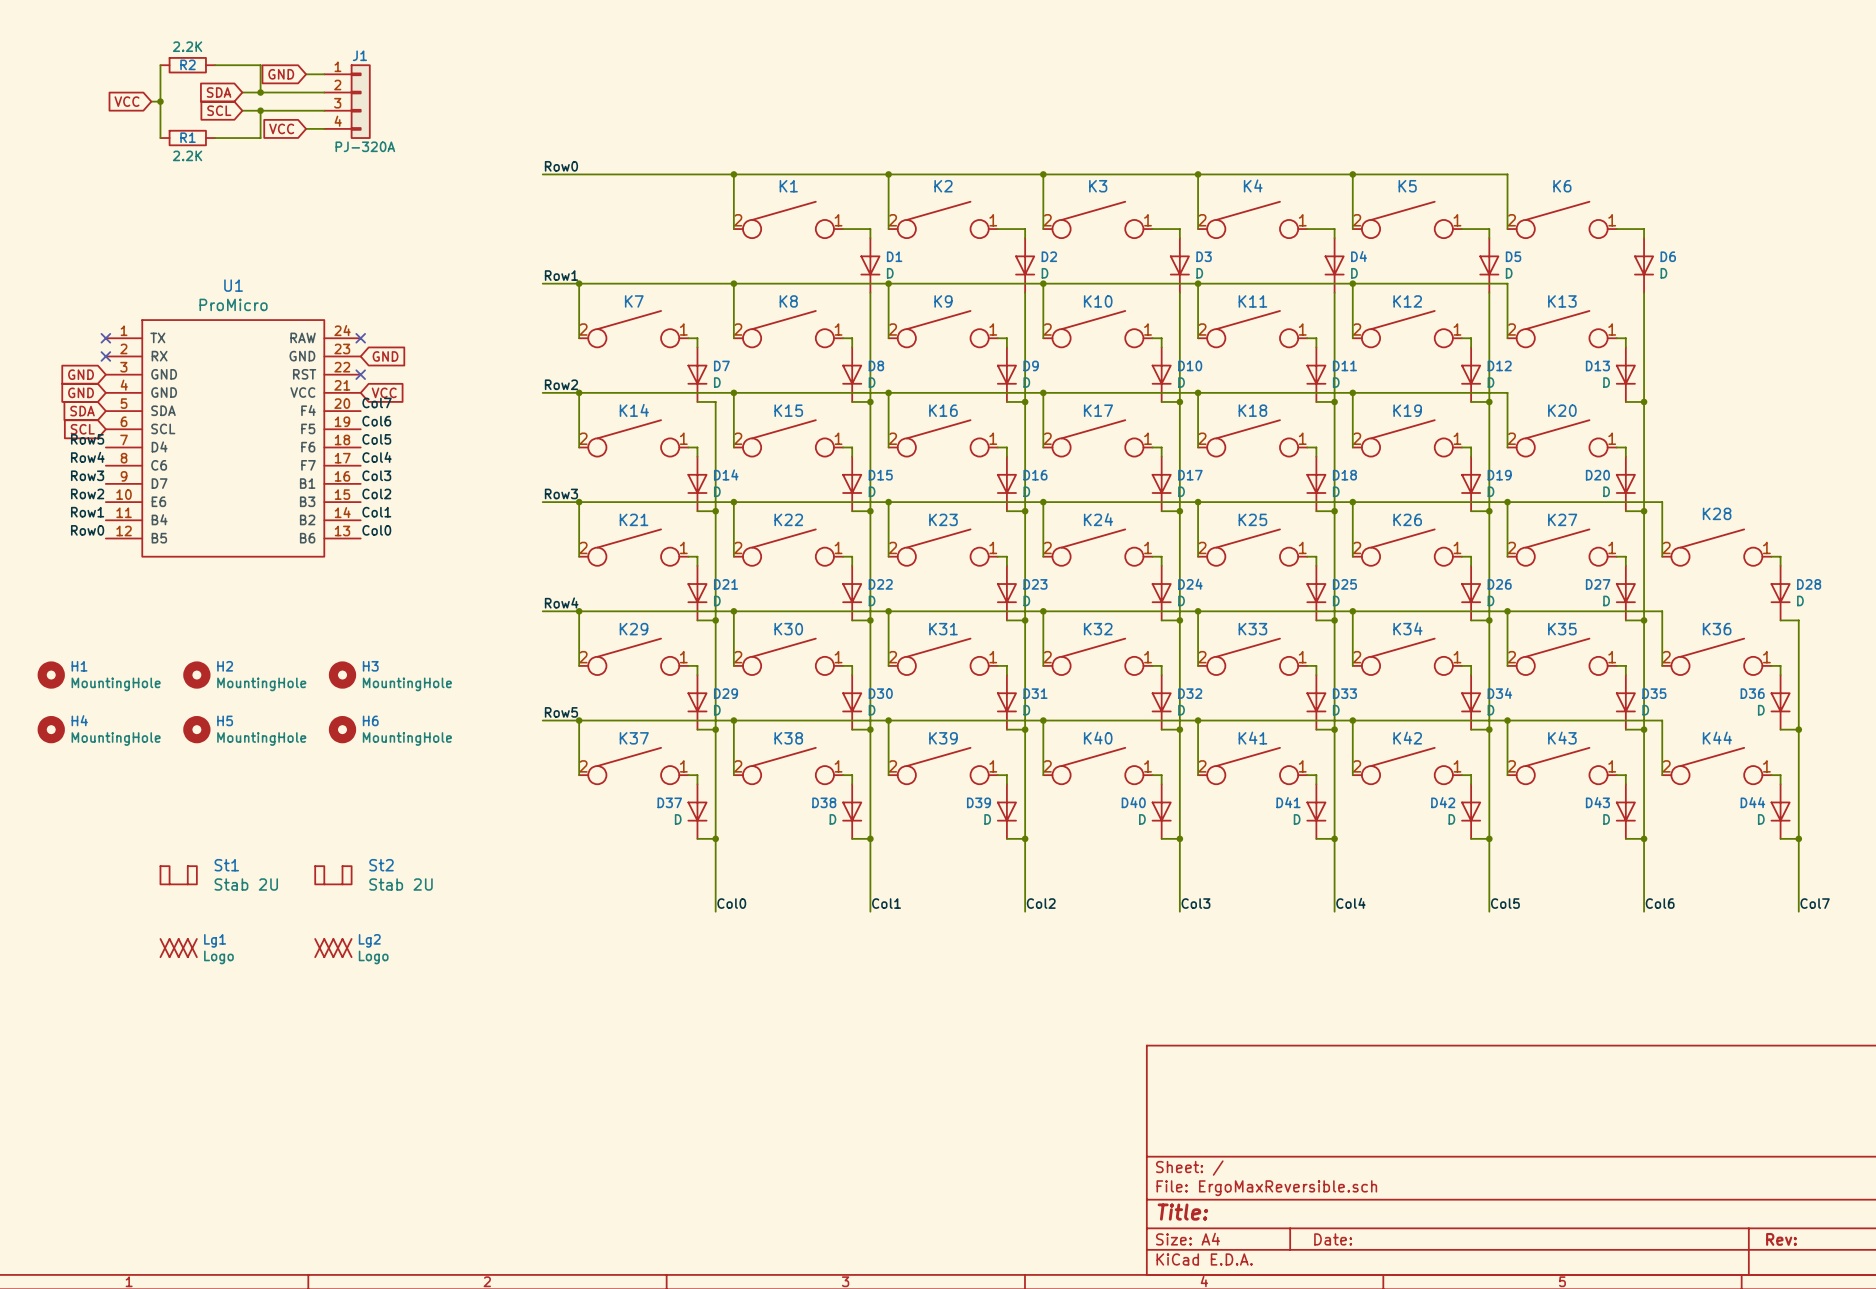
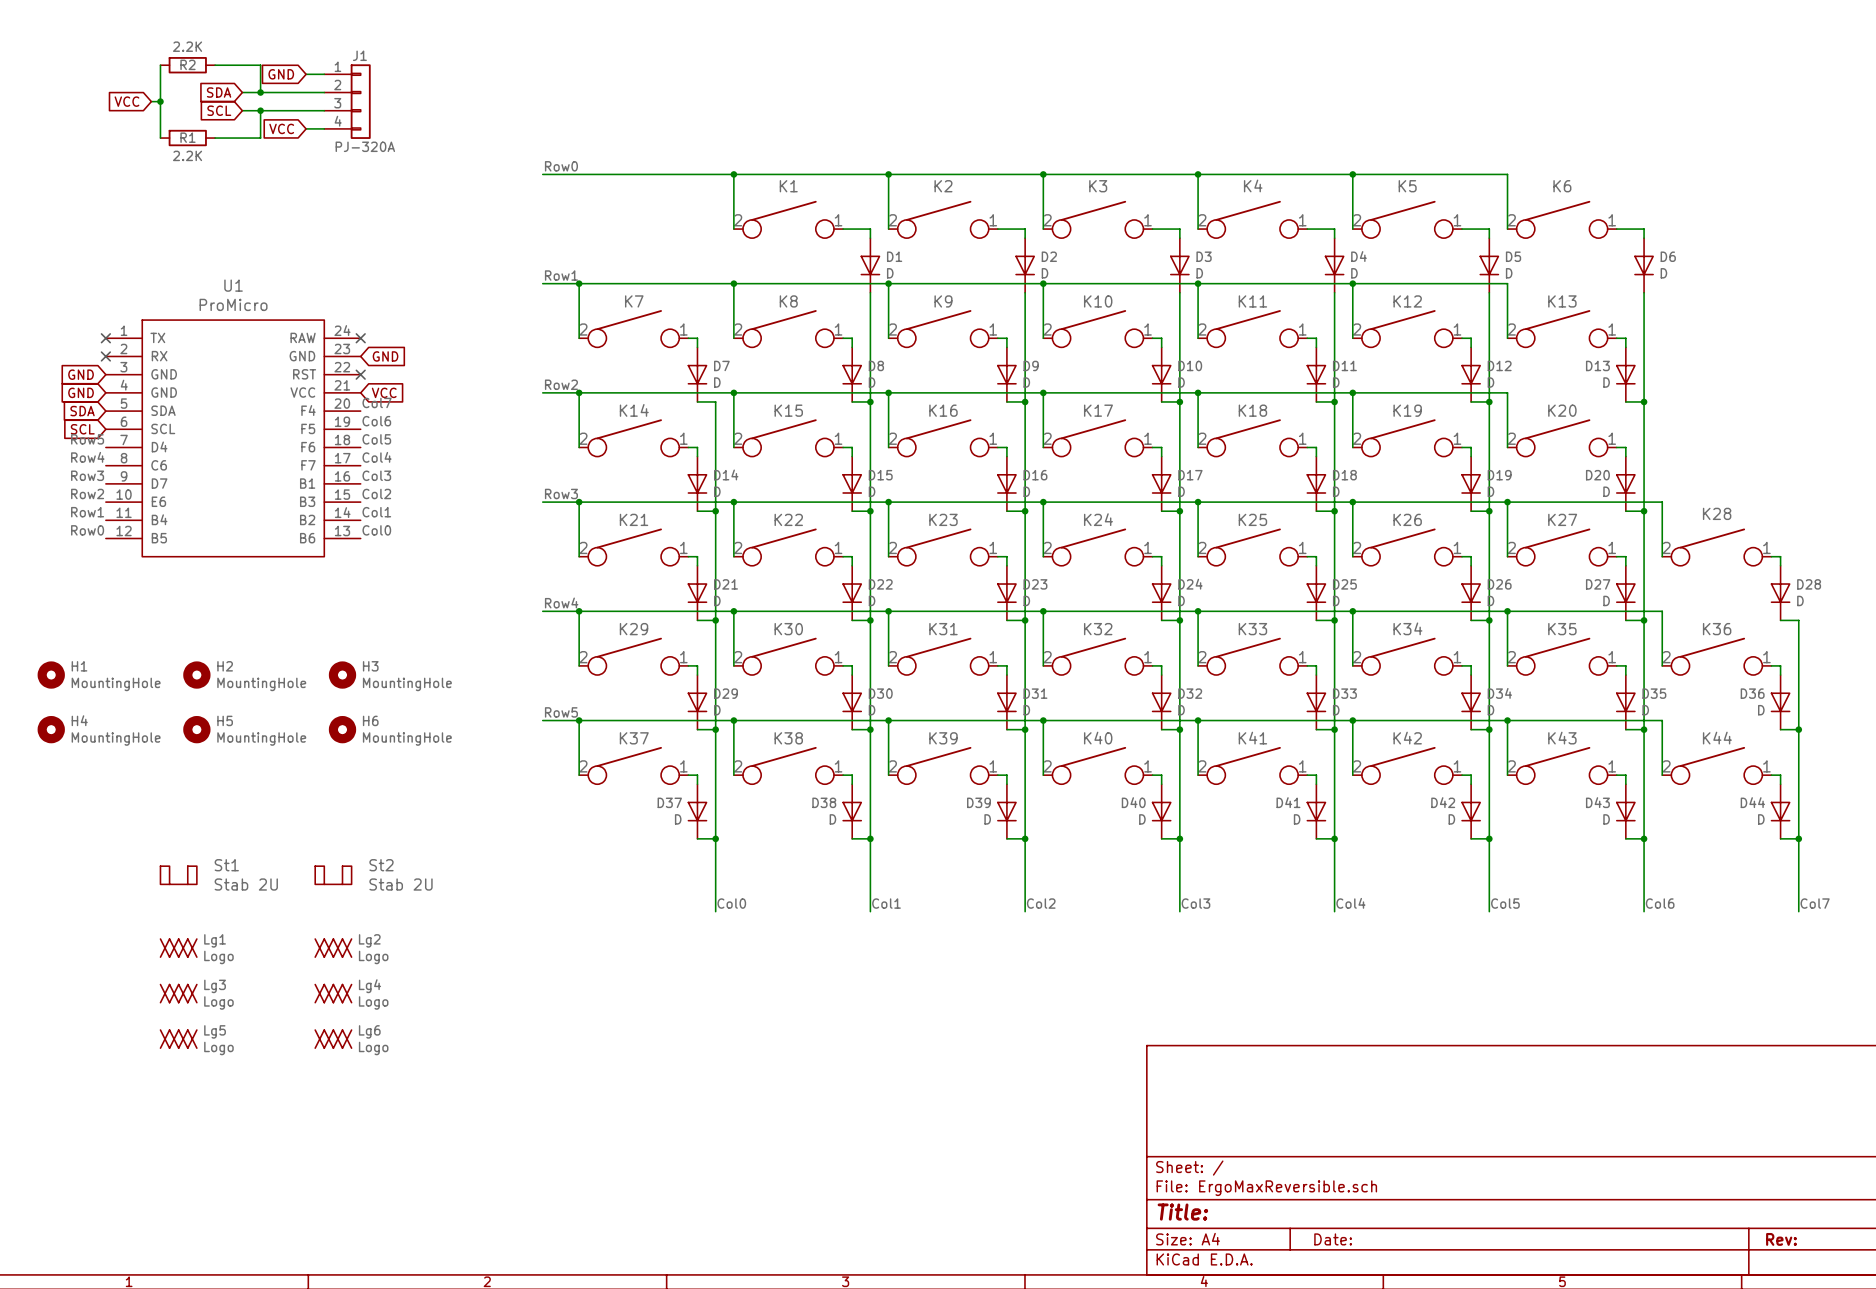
Lg3: none -> Logo (178, 993)
Lg4: none -> Logo (333, 993)
Lg5: none -> Logo (178, 1039)
Lg6: none -> Logo (333, 1039)

